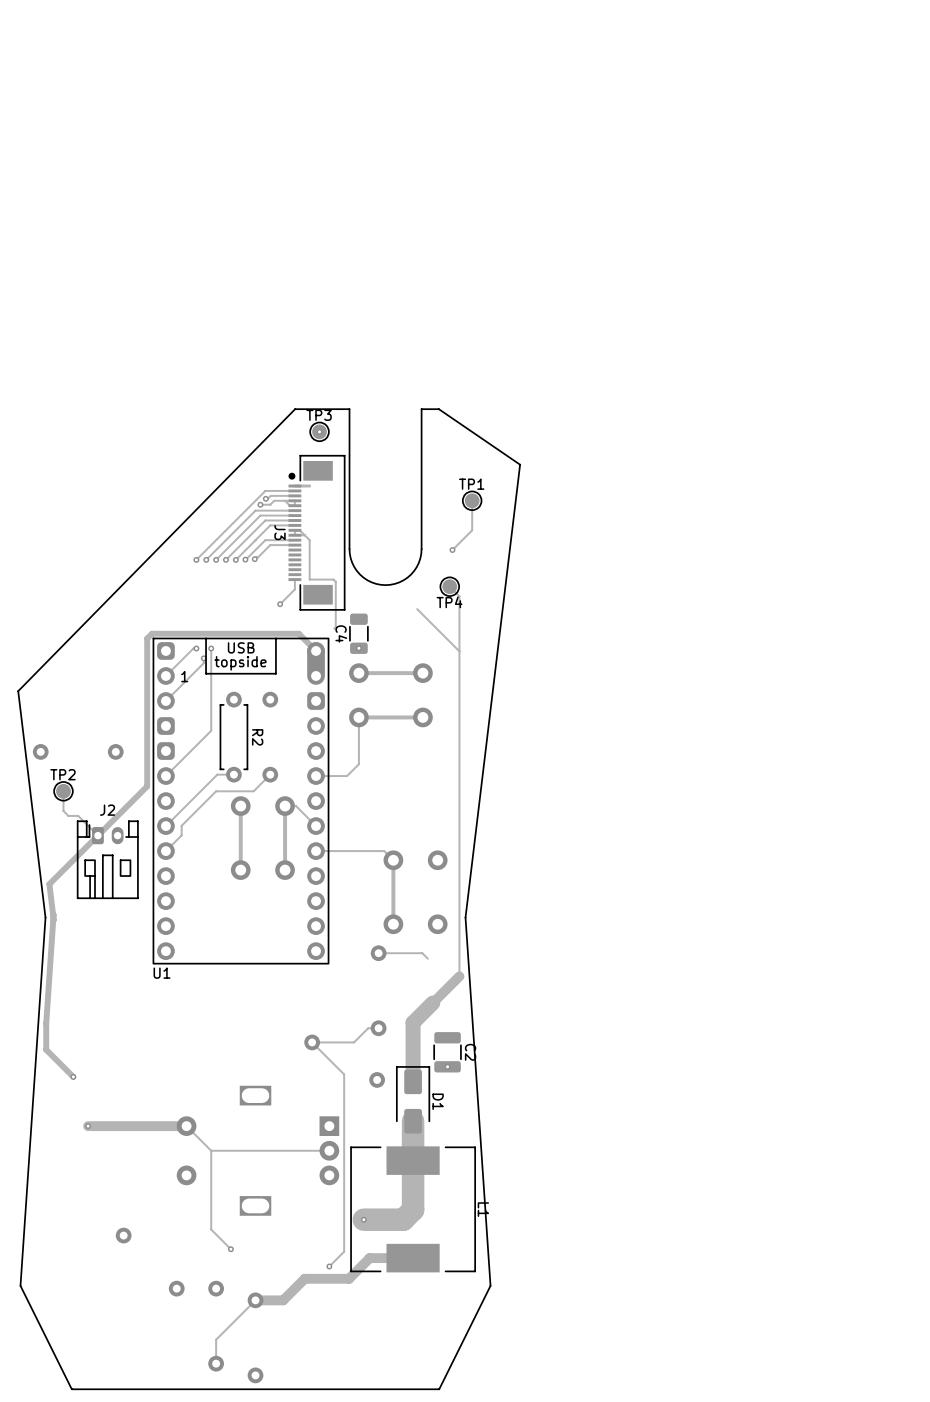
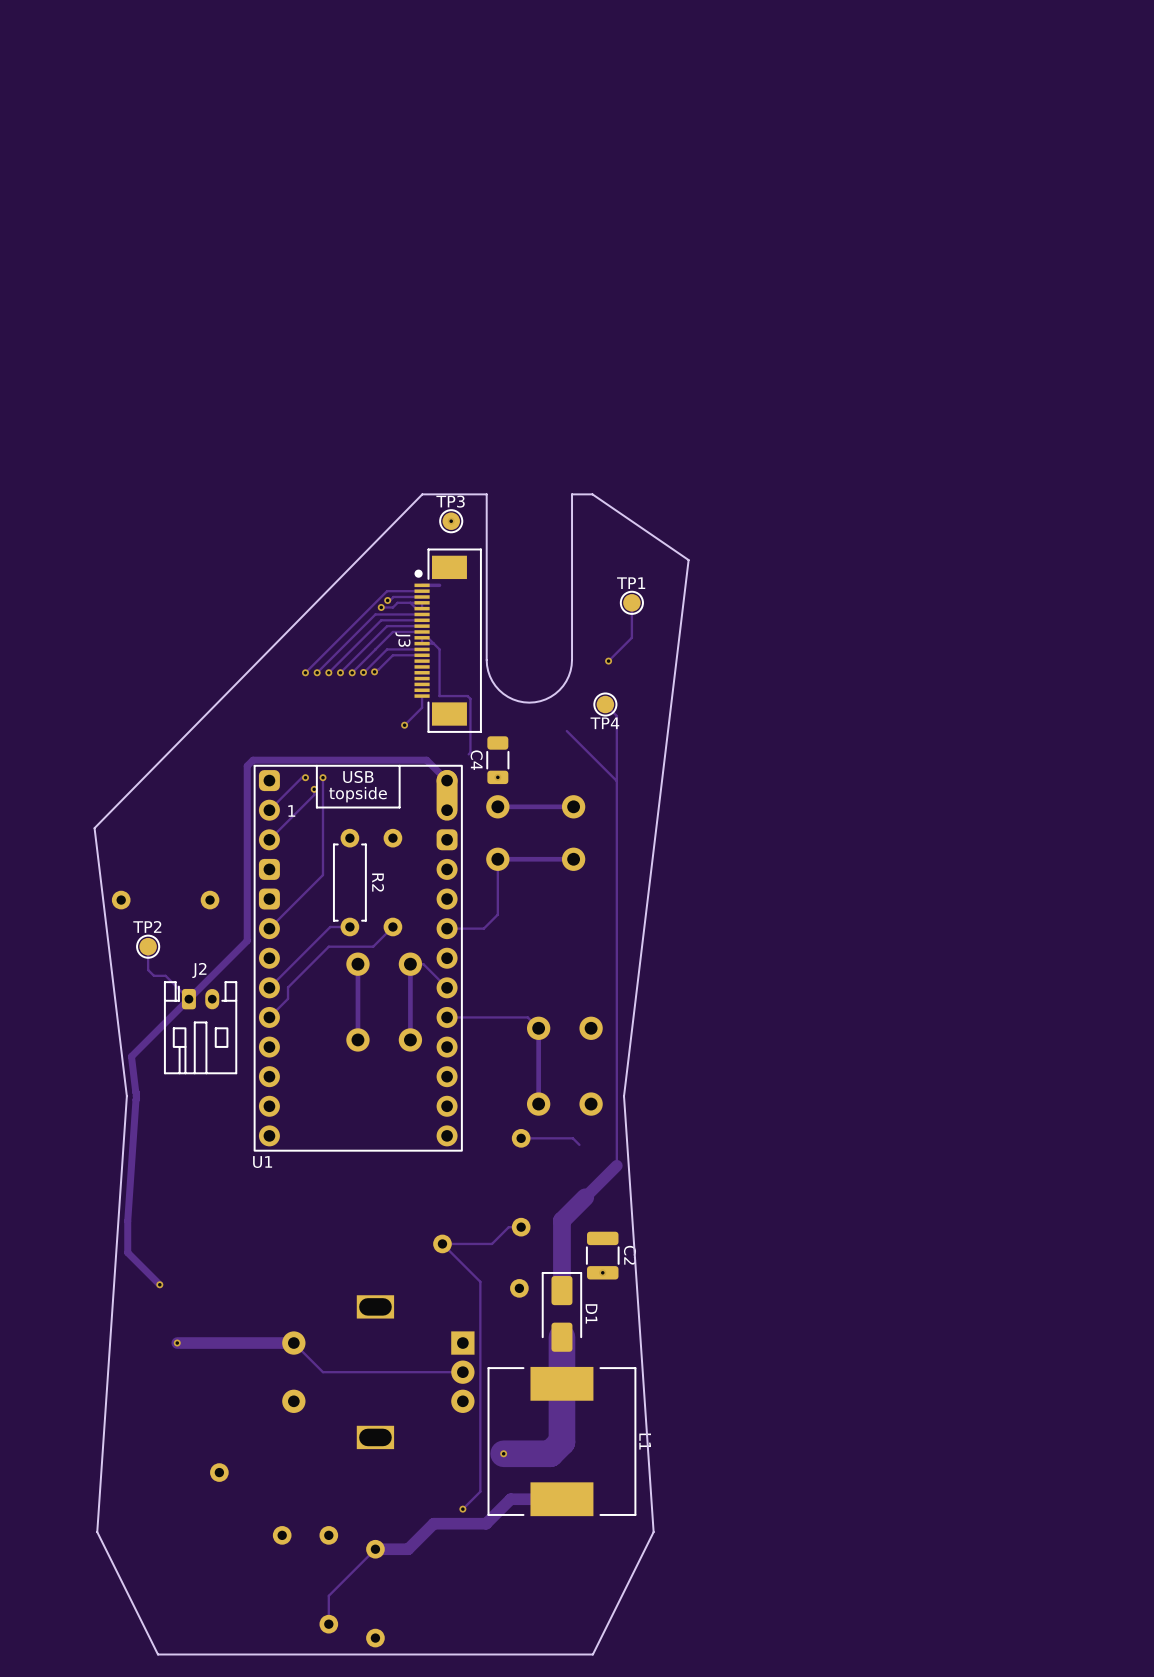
track: (211, 1150) (211, 1229) (230, 1249) -> none
via: (230, 1249) -> none

